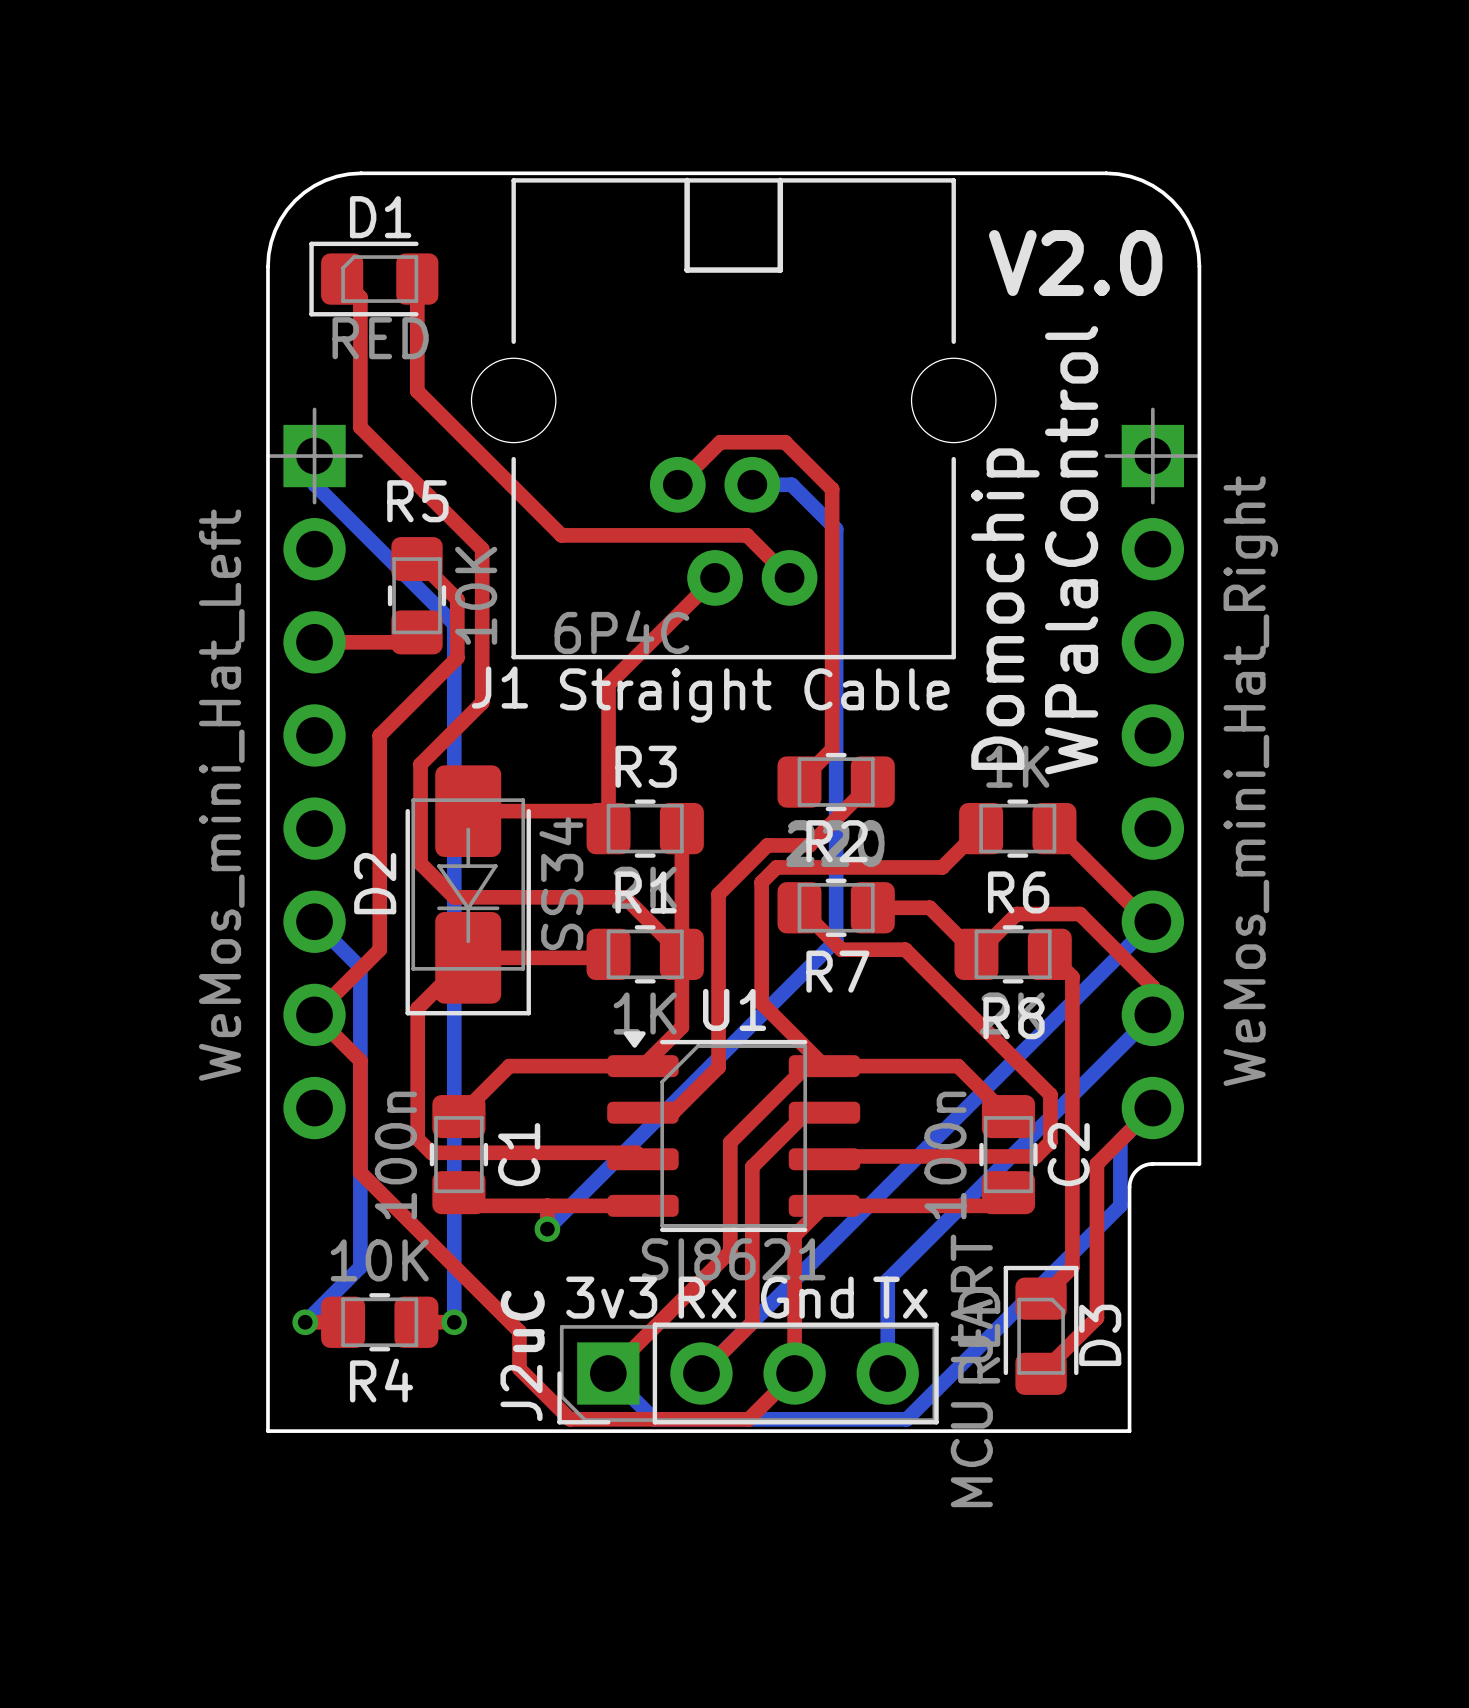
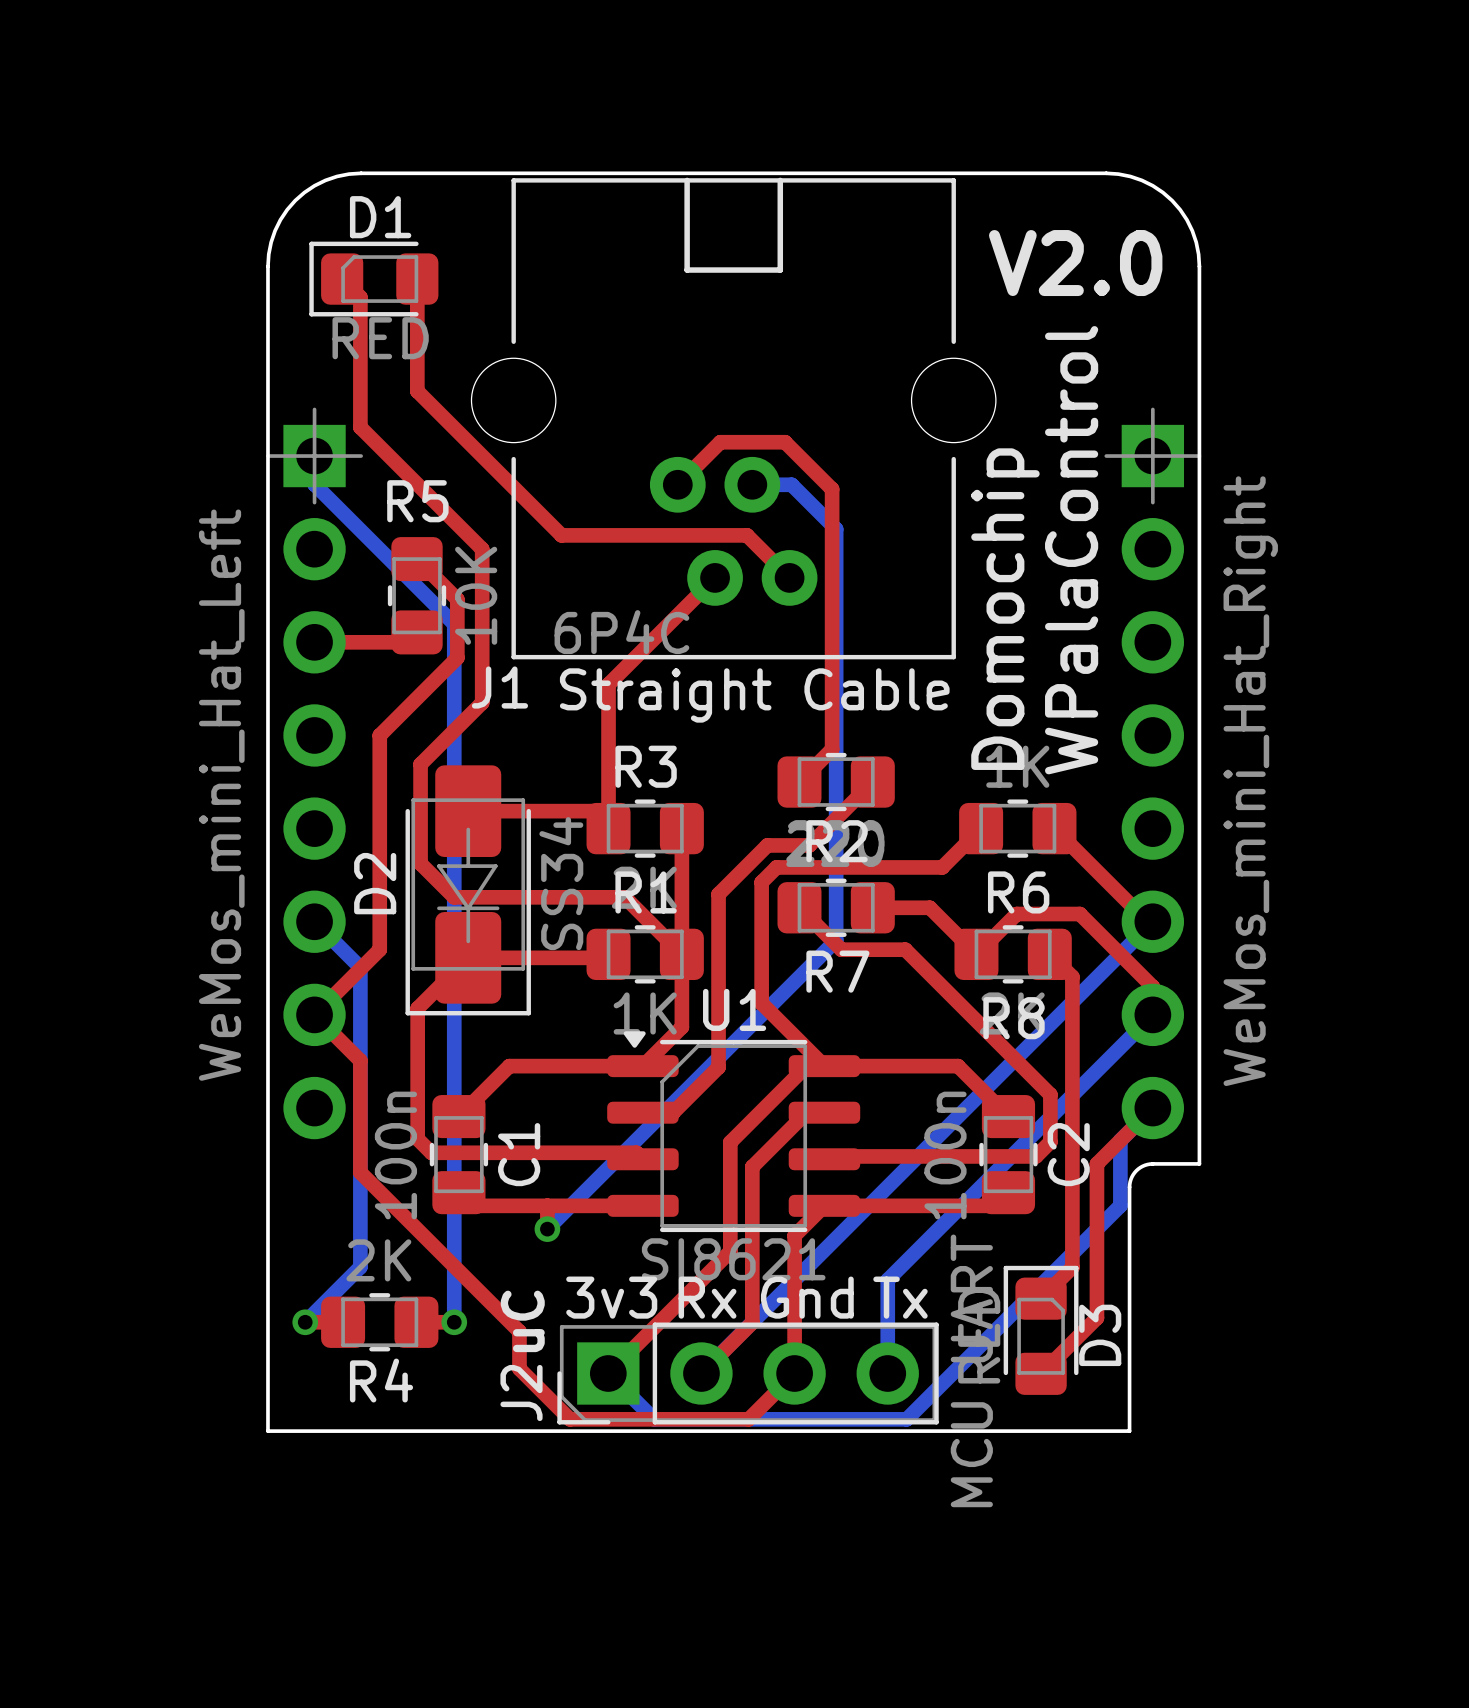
R4 value: 10K (379, 1260) -> 2K (378, 1260)

